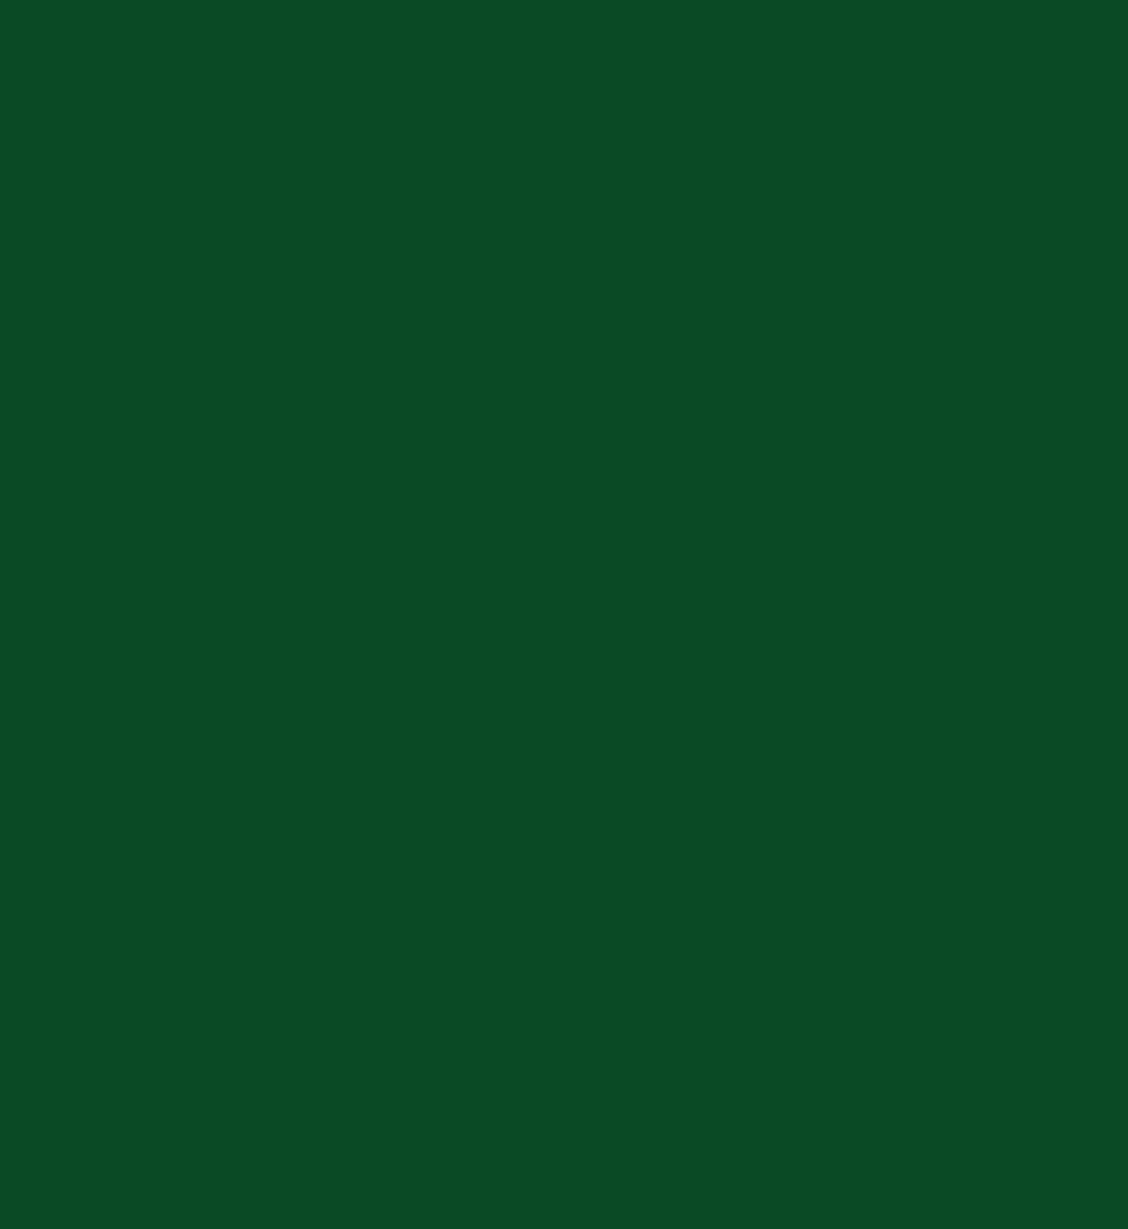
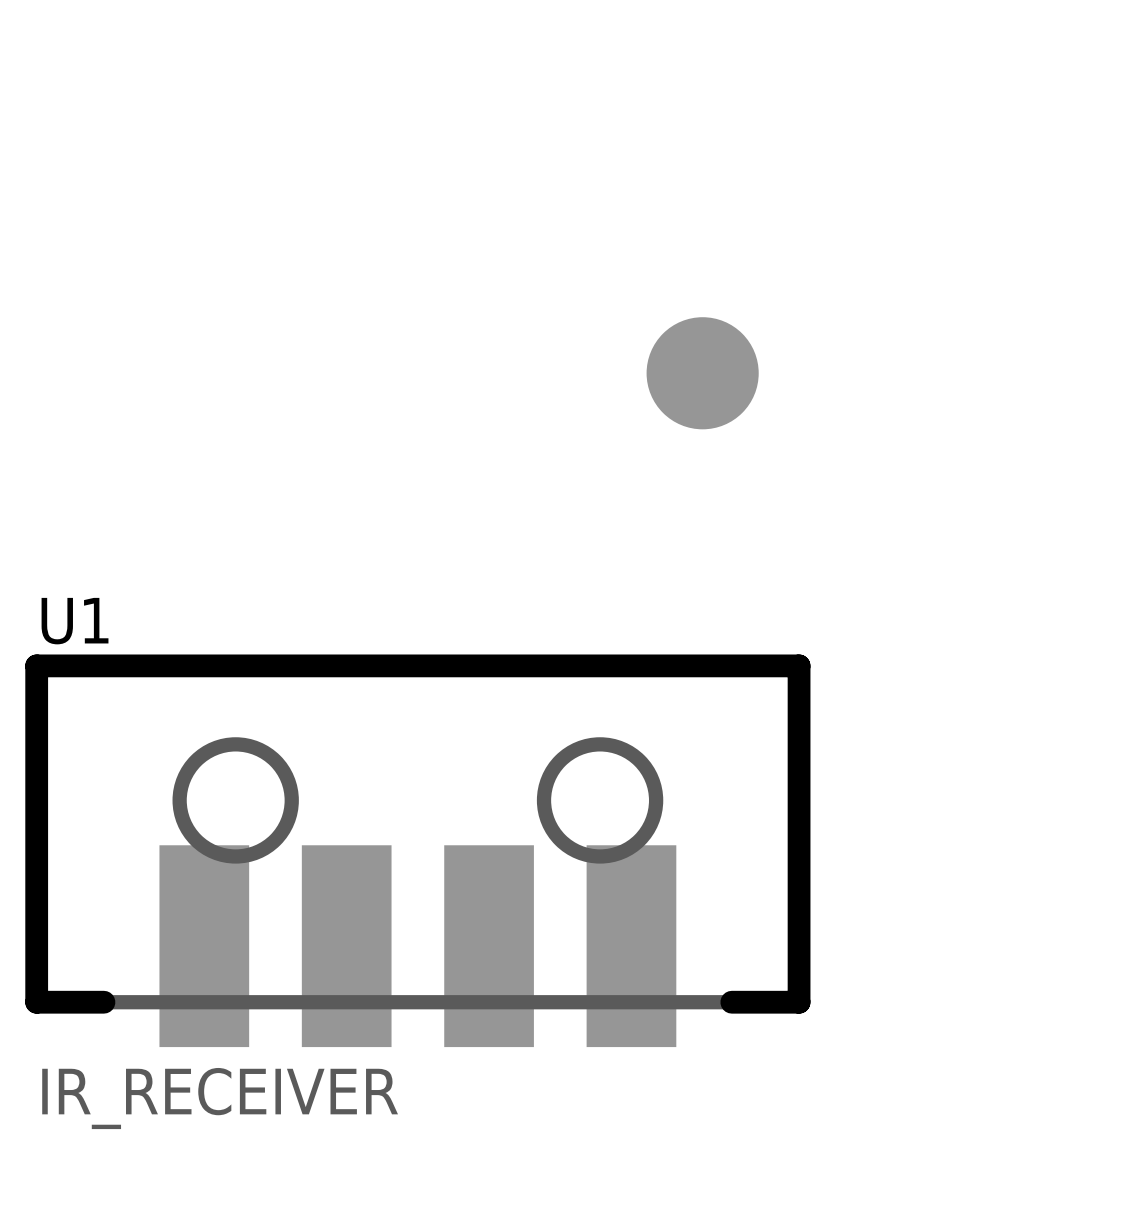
part: none -> (702, 373)
U1: none -> IR_RECEIVER (417, 850)

